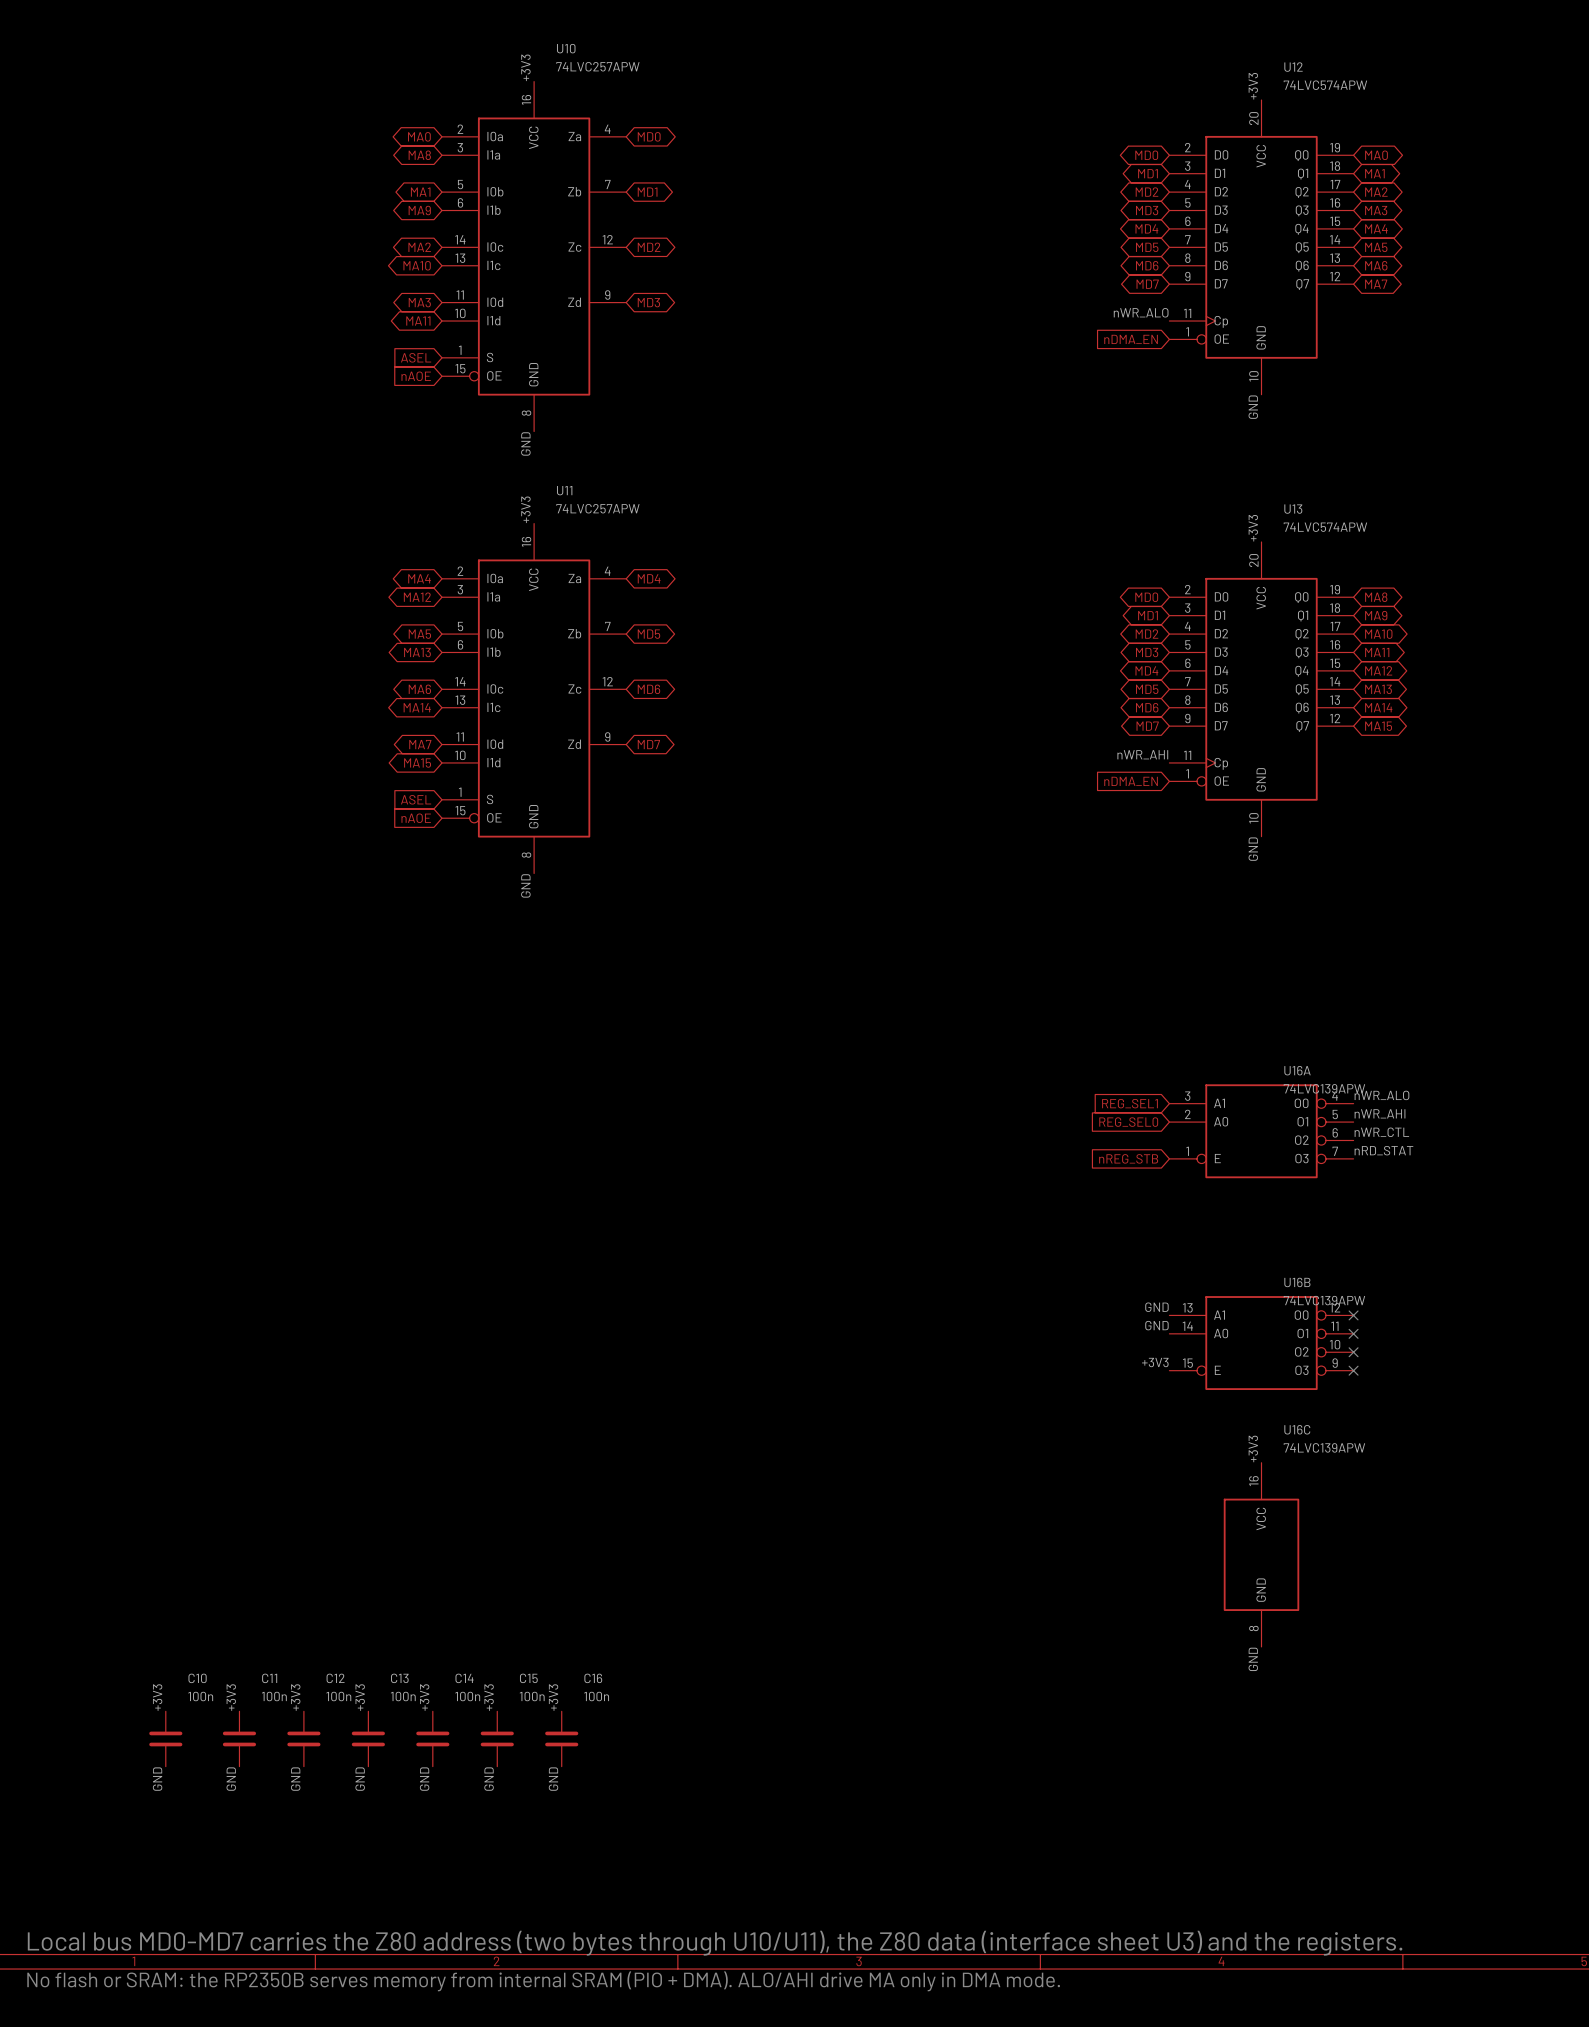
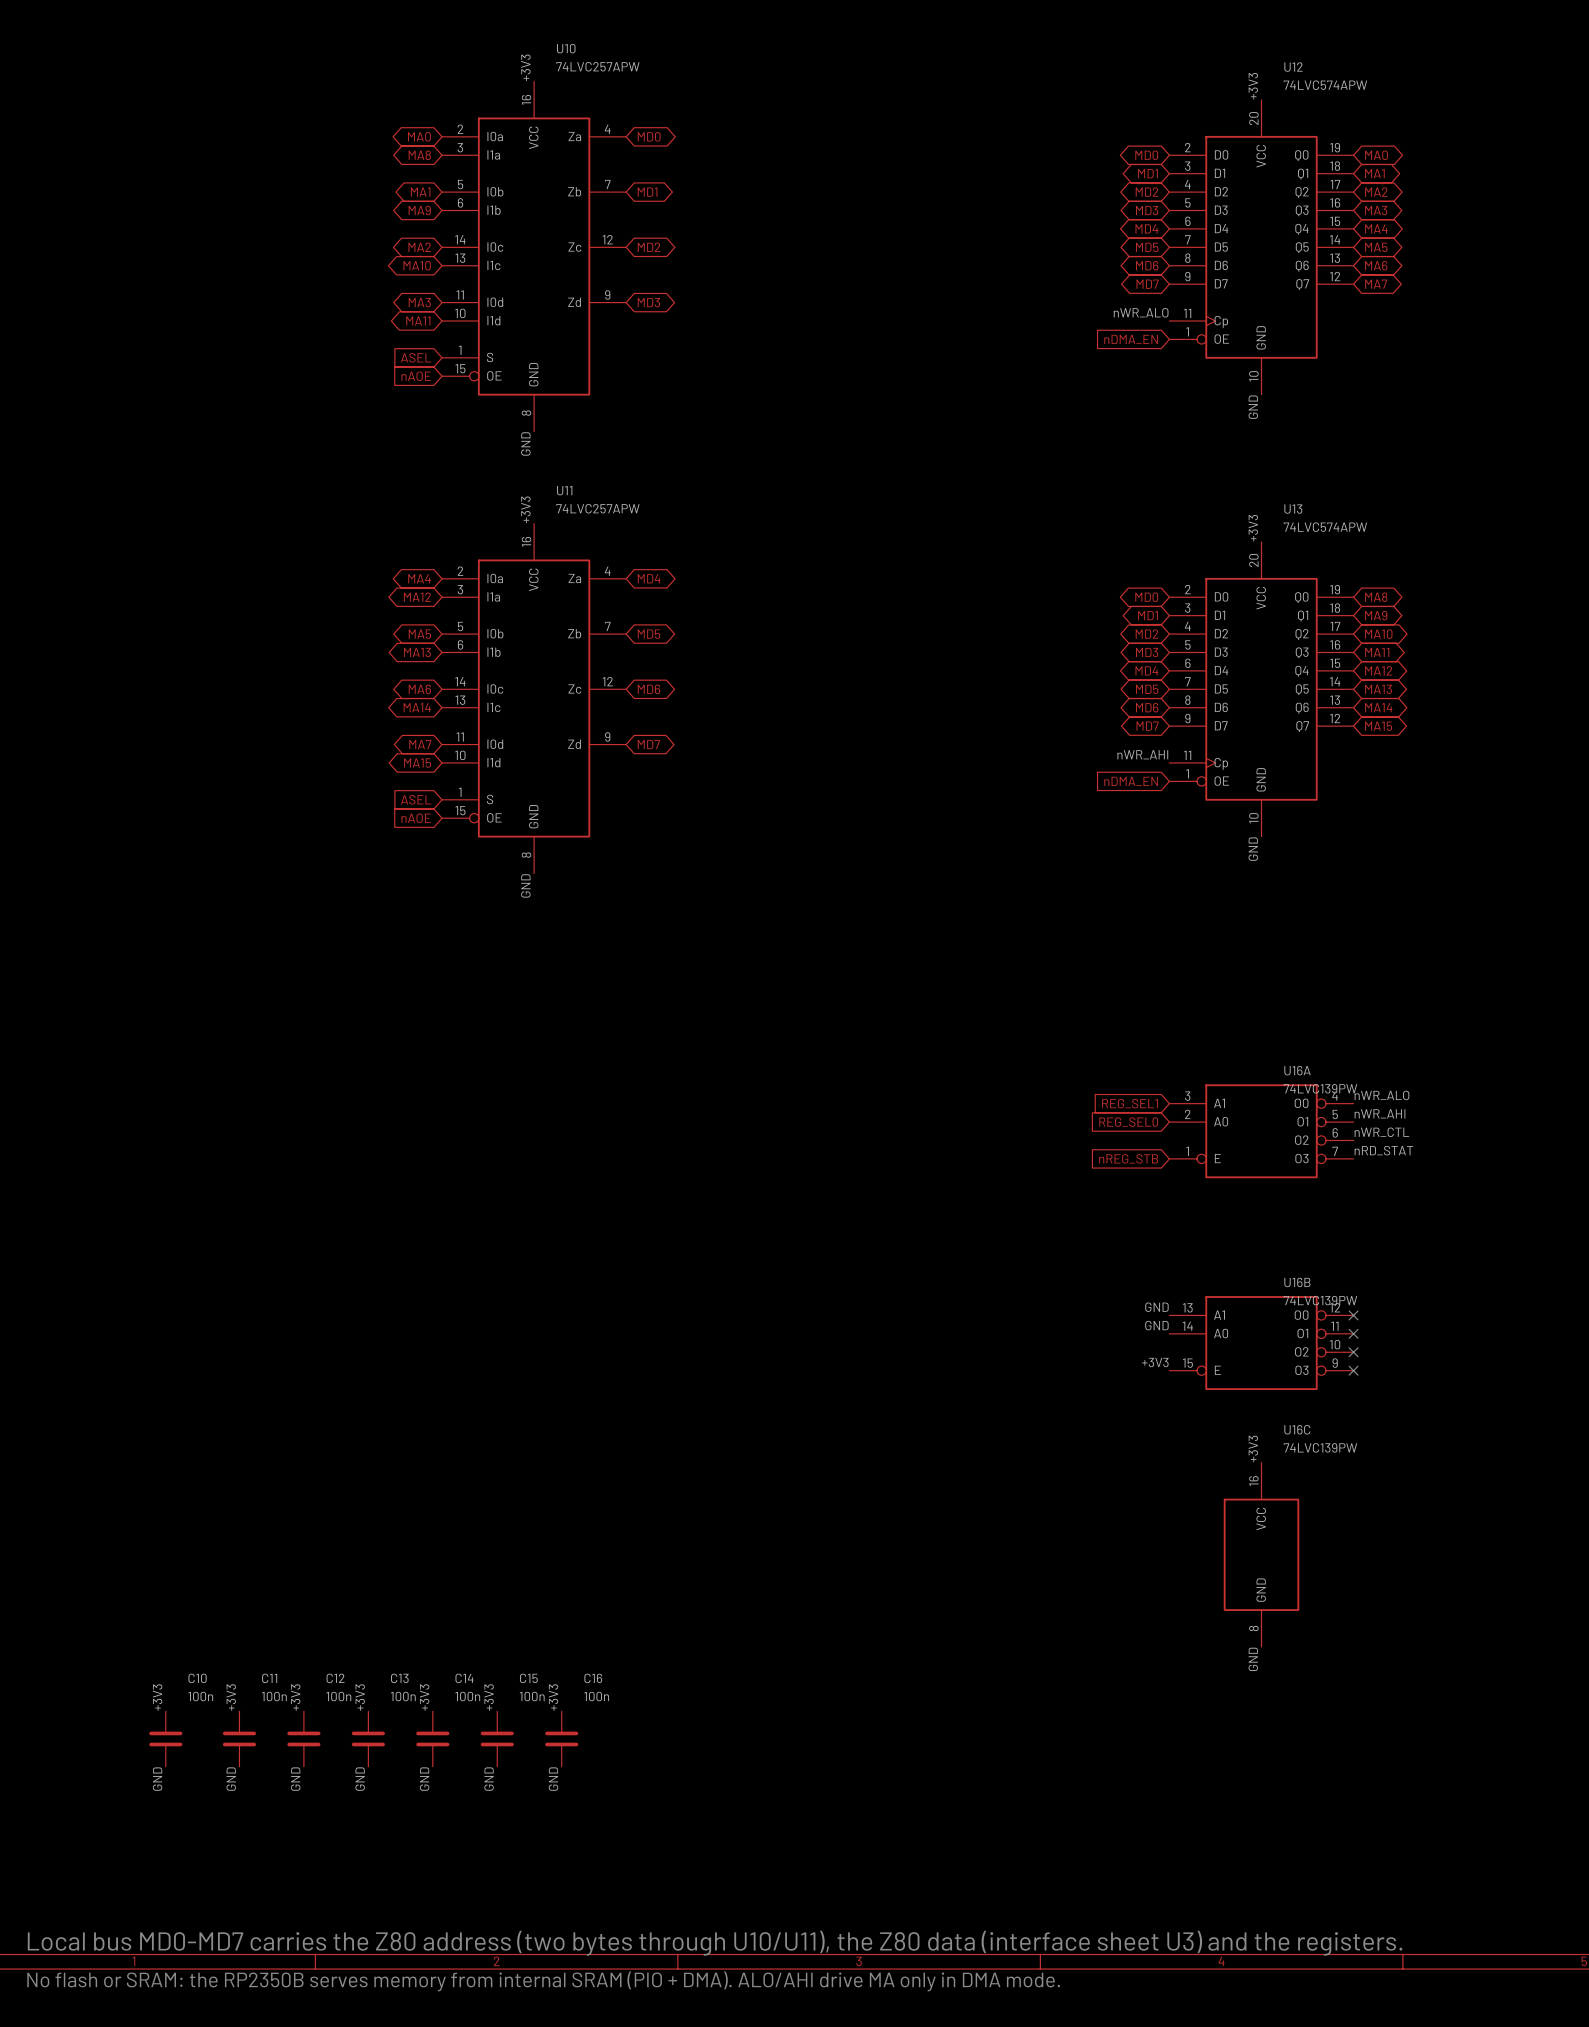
U16A value: 74LVC139APW (1324, 1088) -> 74LVC139PW (1320, 1088)
U16B value: 74LVC139APW (1324, 1300) -> 74LVC139PW (1320, 1300)
U16C value: 74LVC139APW (1324, 1447) -> 74LVC139PW (1320, 1447)

